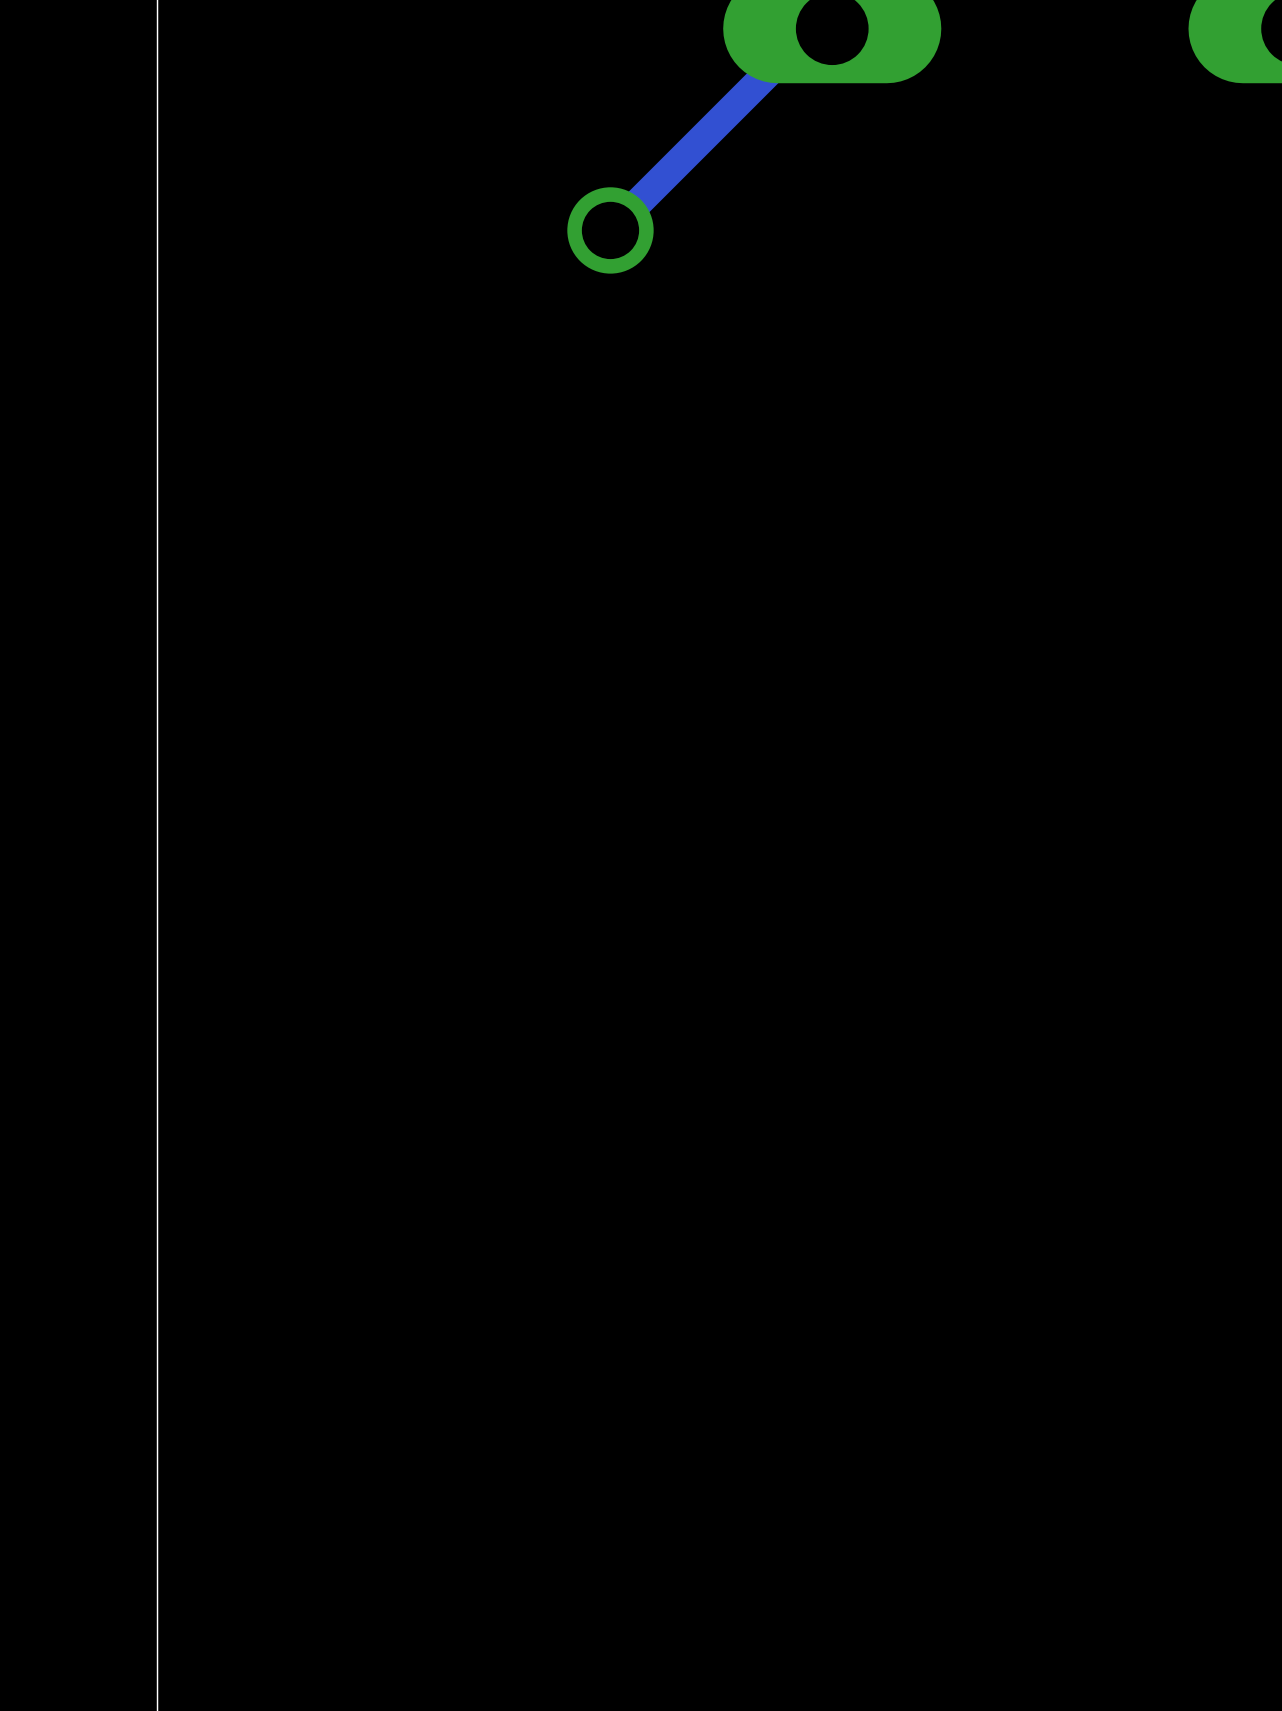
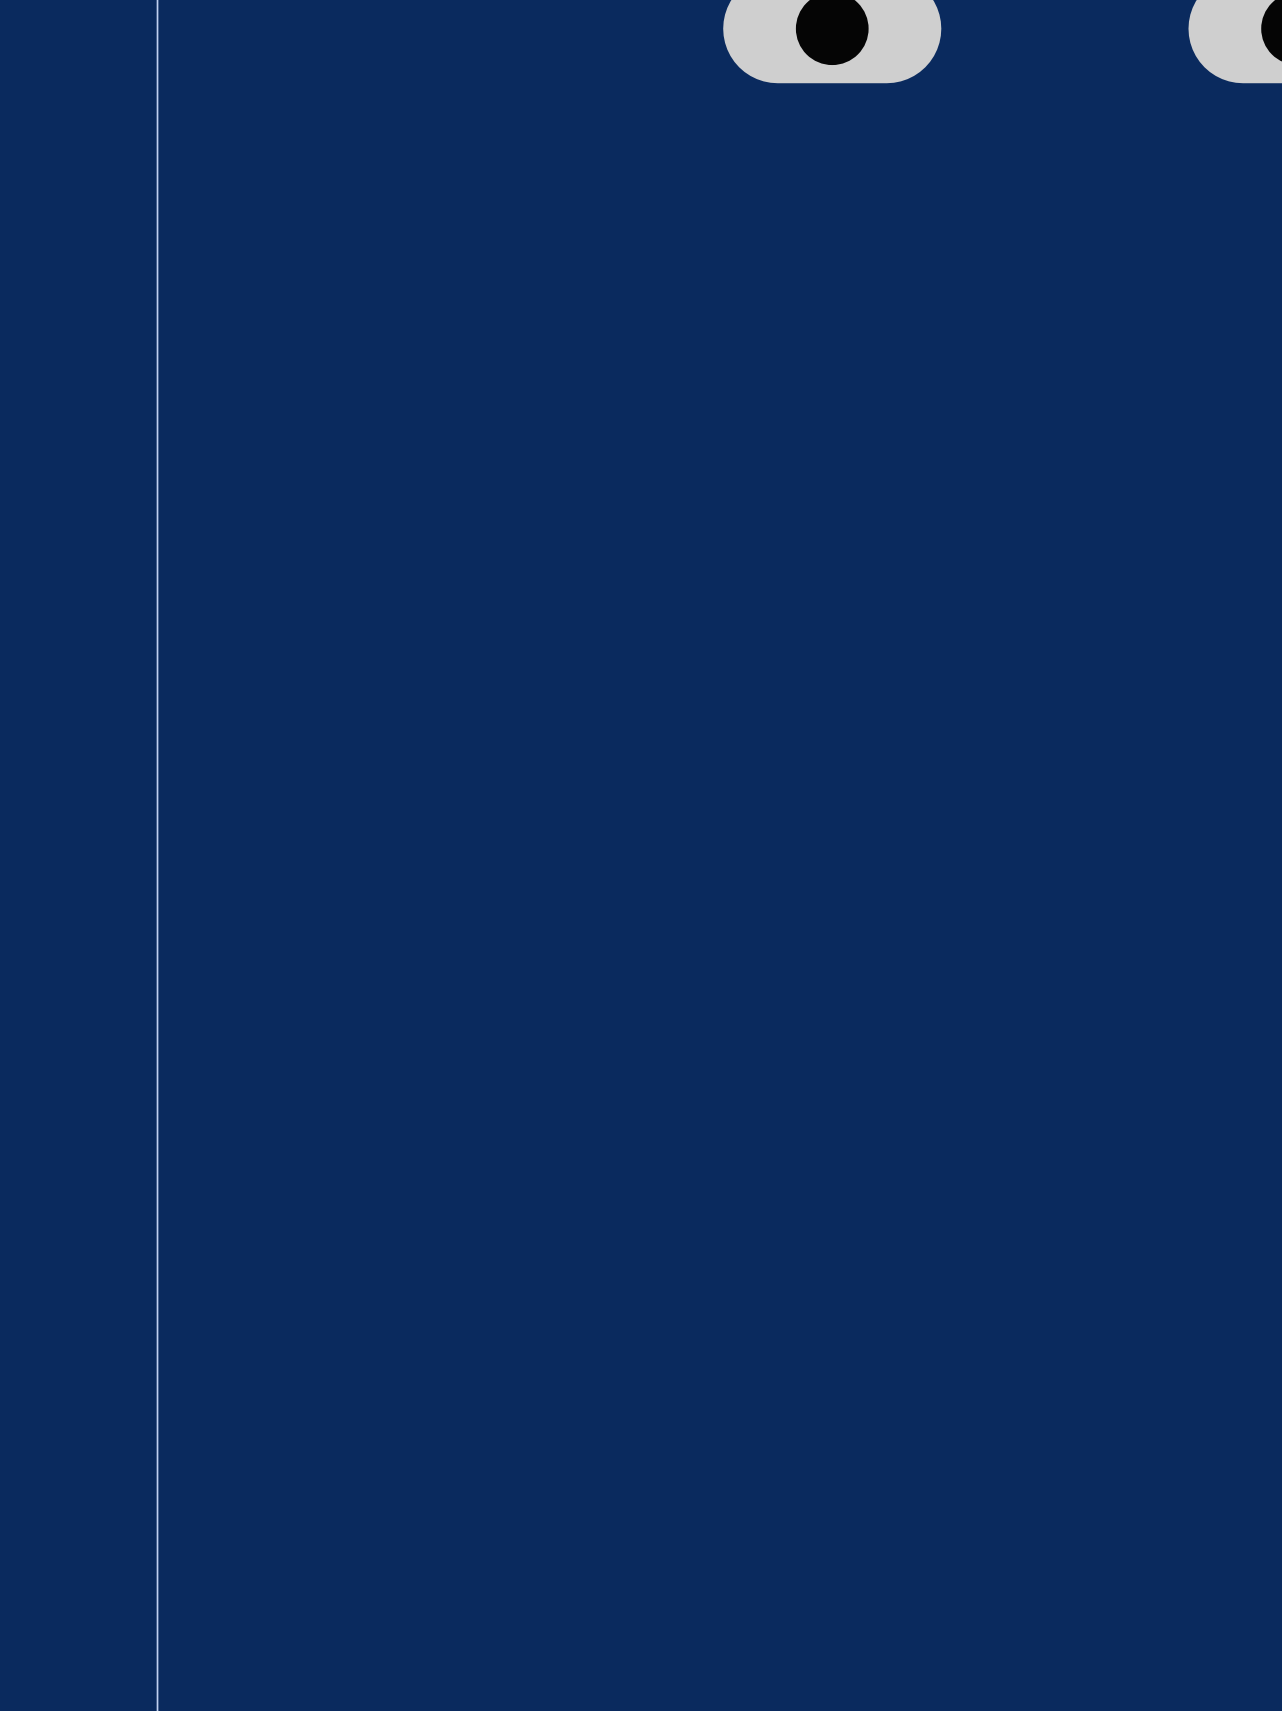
track: (832, 28) (812, 28) (610, 230) -> none
via: (610, 230) -> none

